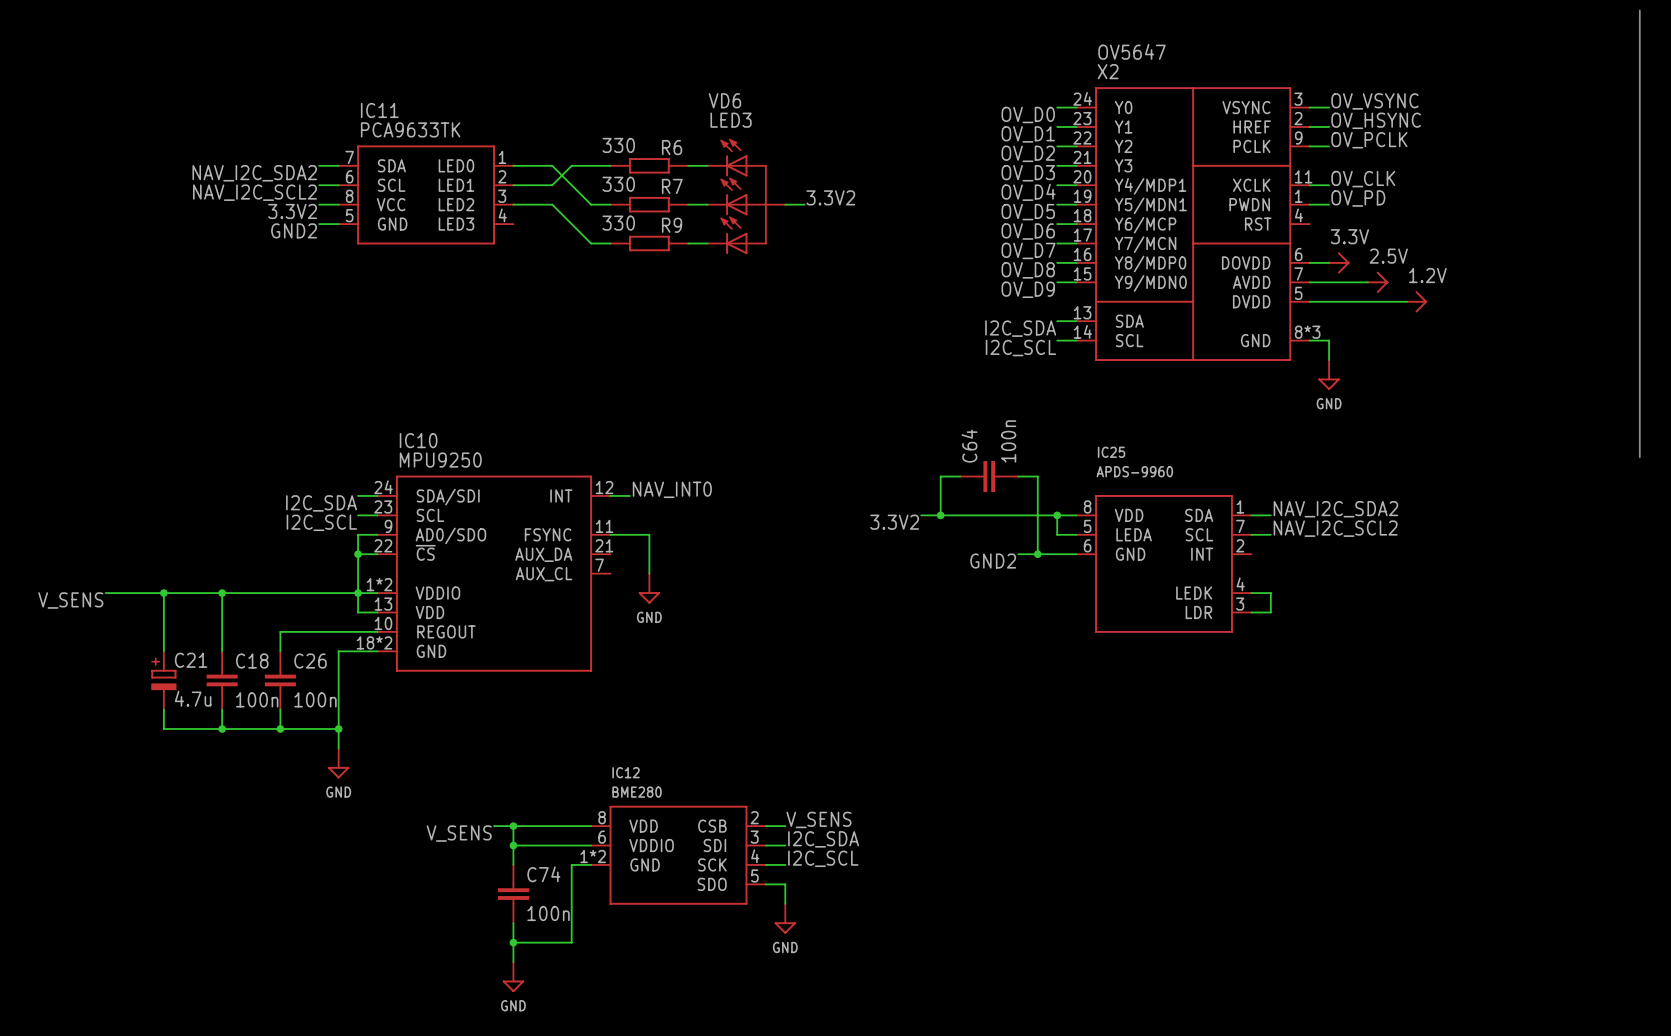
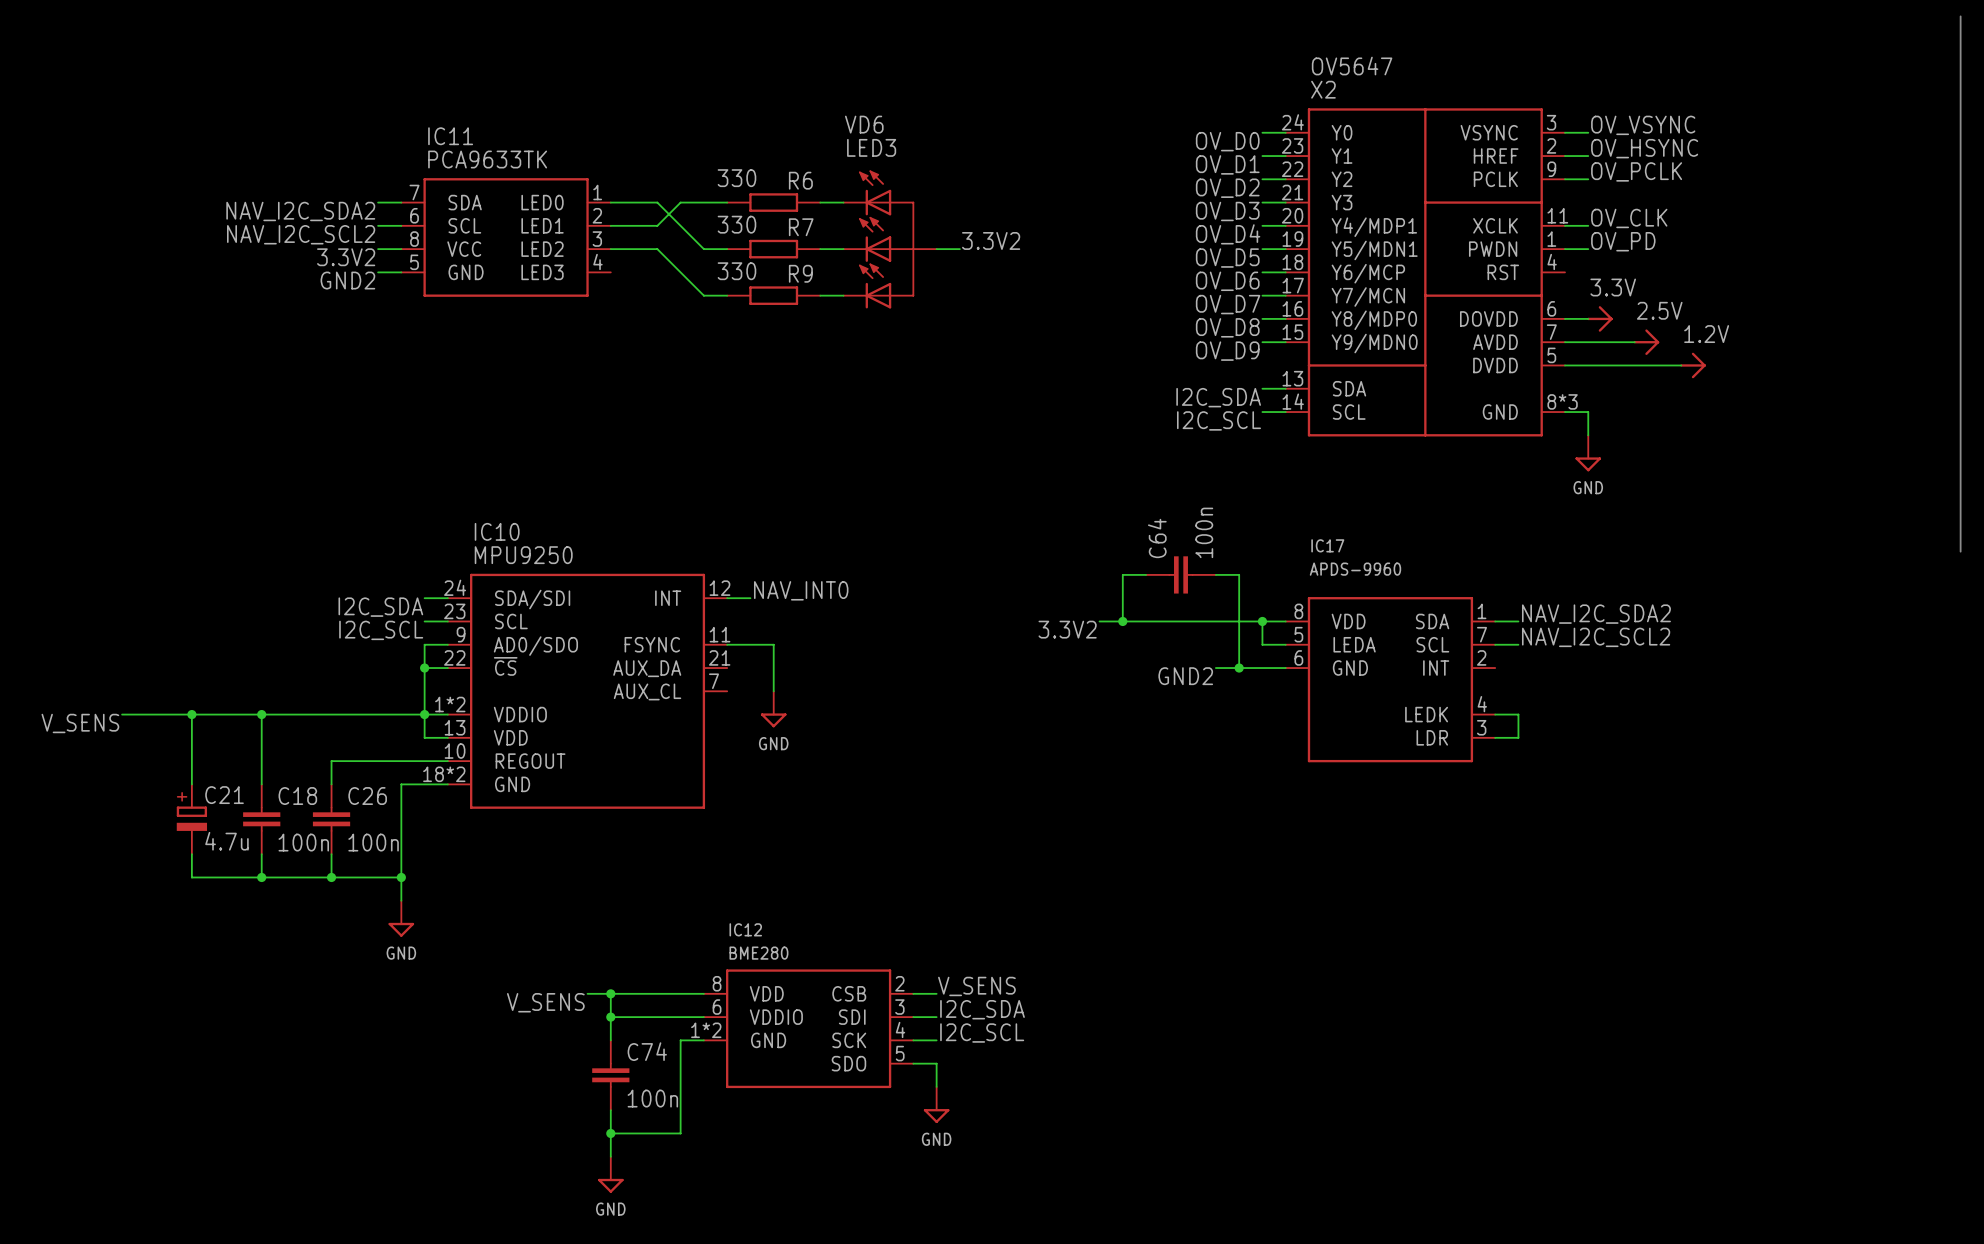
IC25 name: IC25 (1111, 452) -> IC17 (1327, 545)

